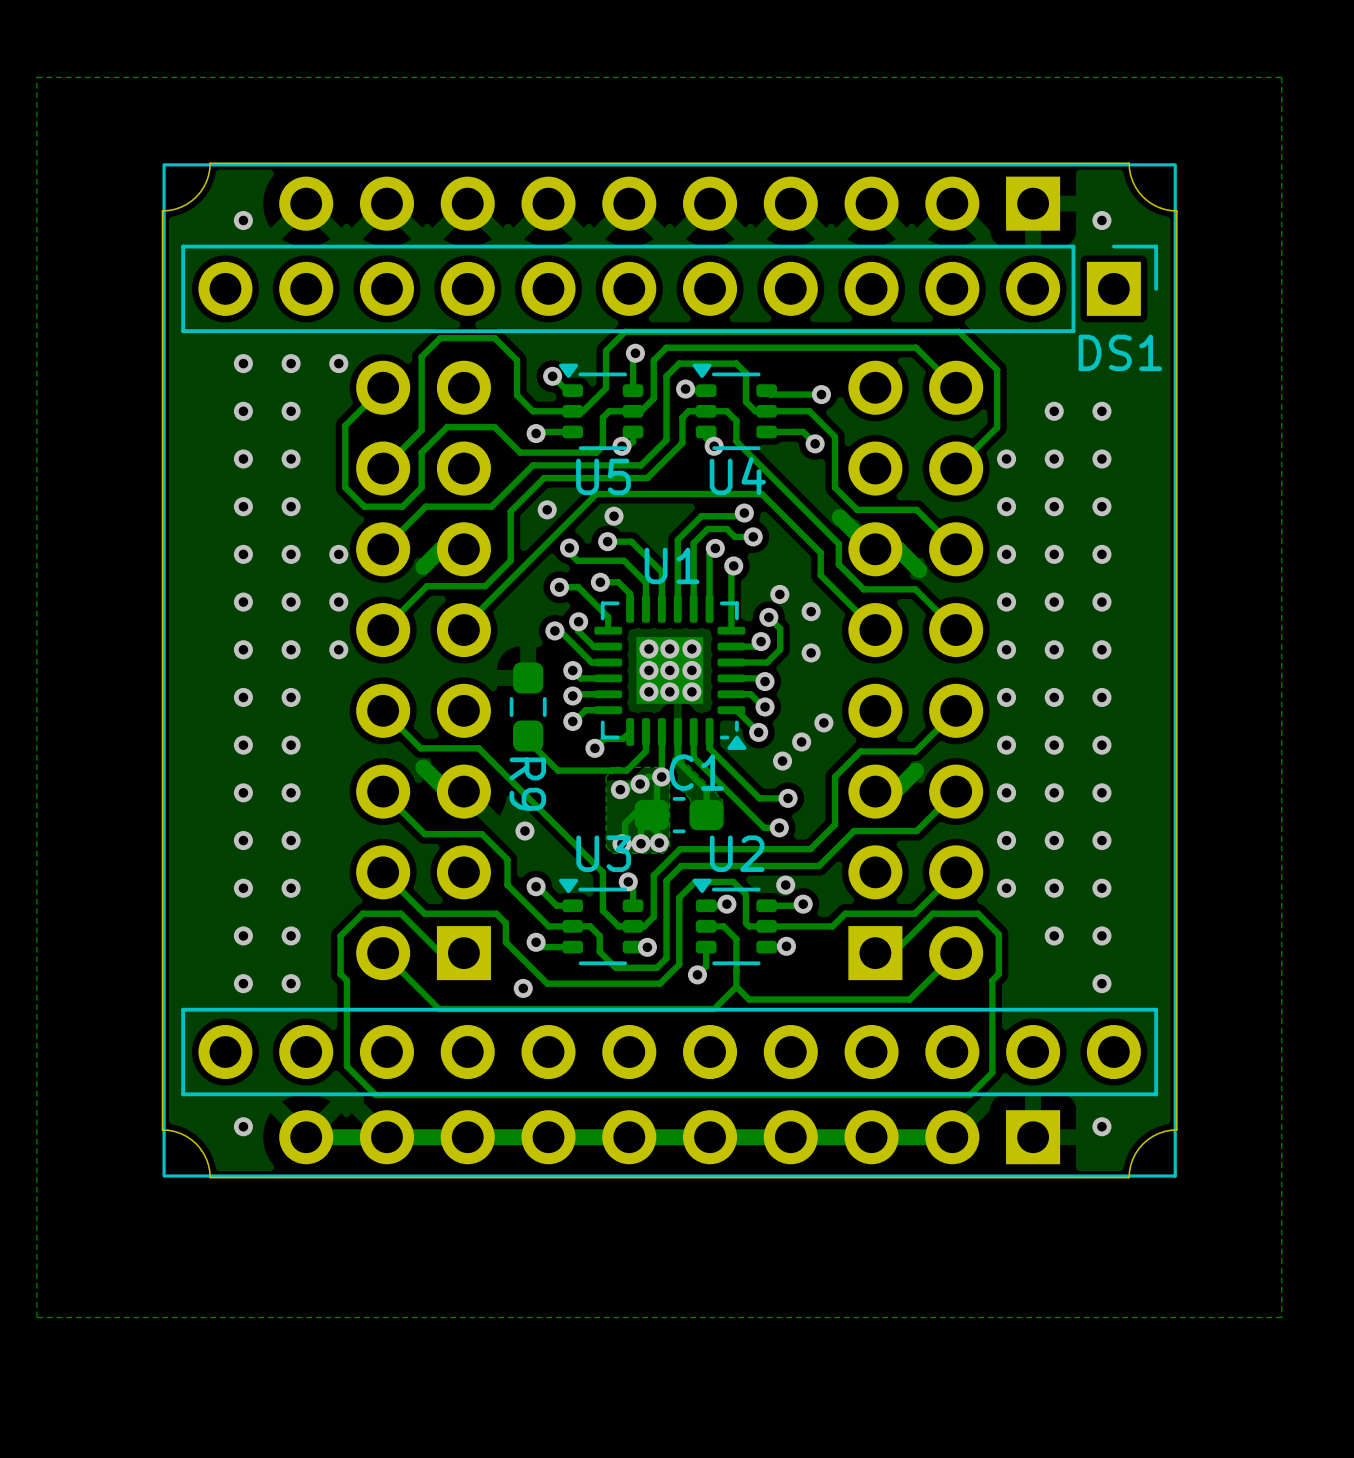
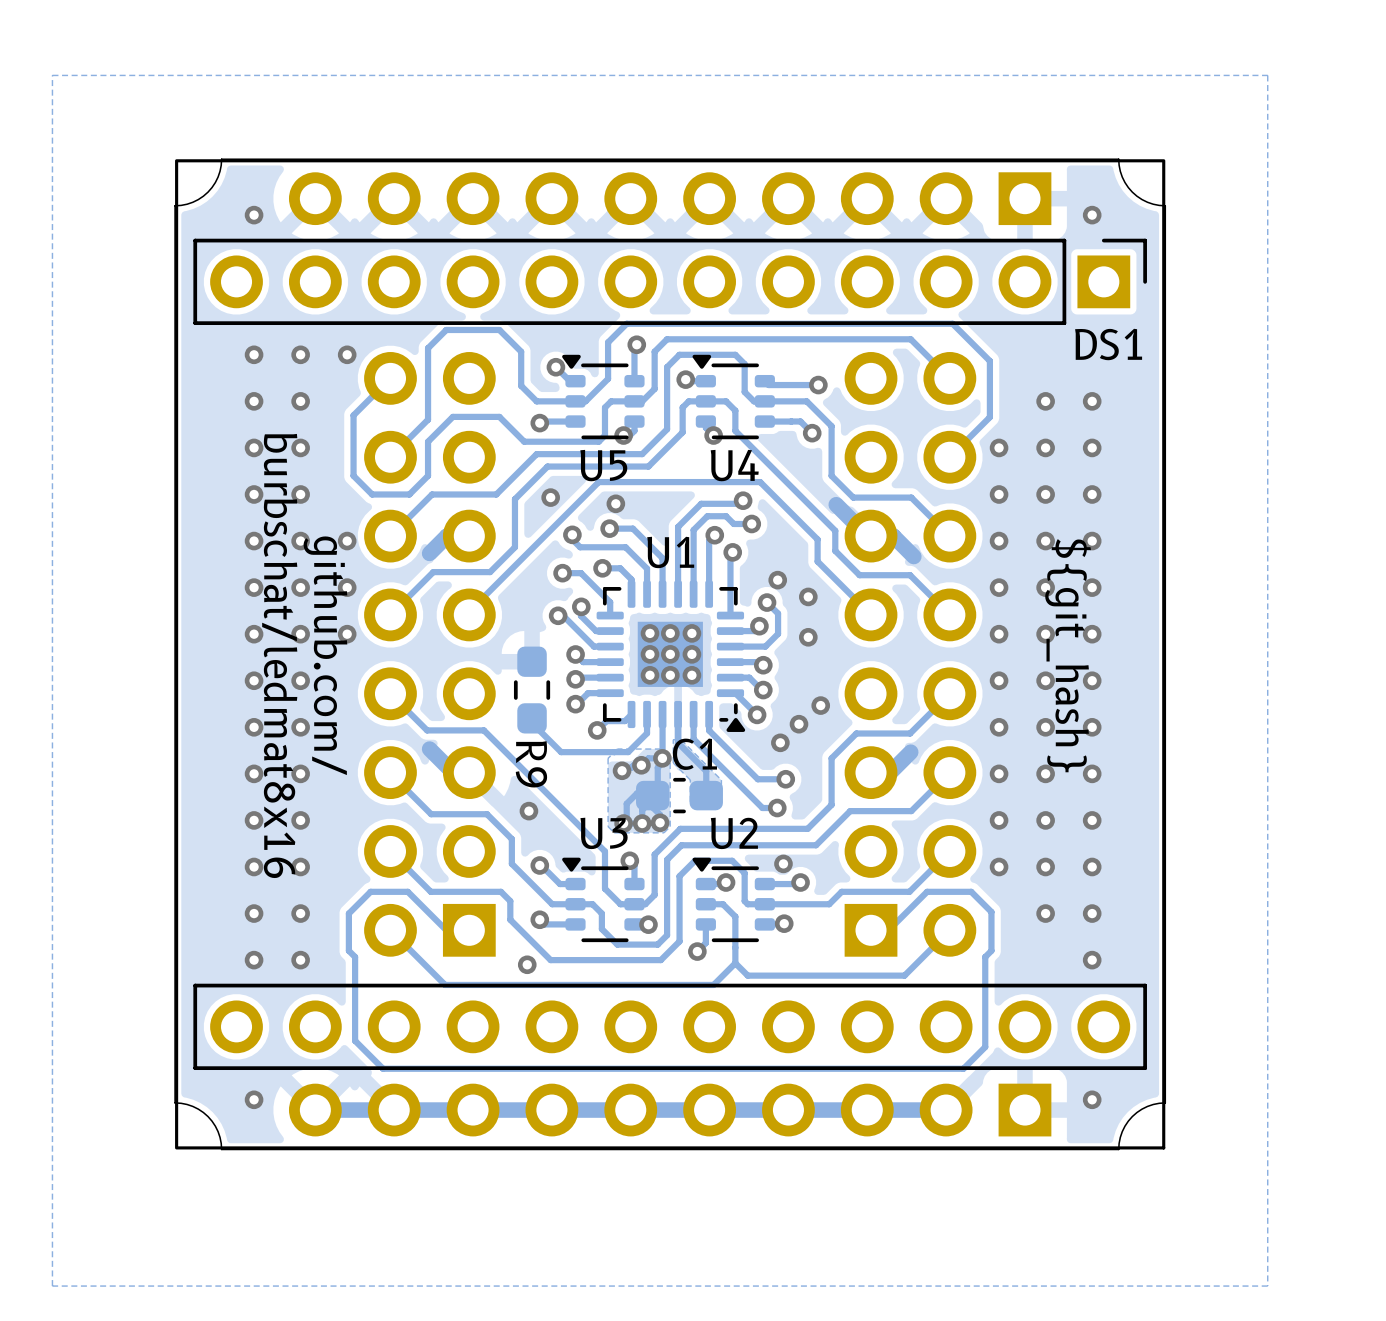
text: none -> burbschat/ledmat8x16 (279, 655)
text: none -> ${git_hash} (1068, 655)
text: none -> github.com/ (325, 655)

